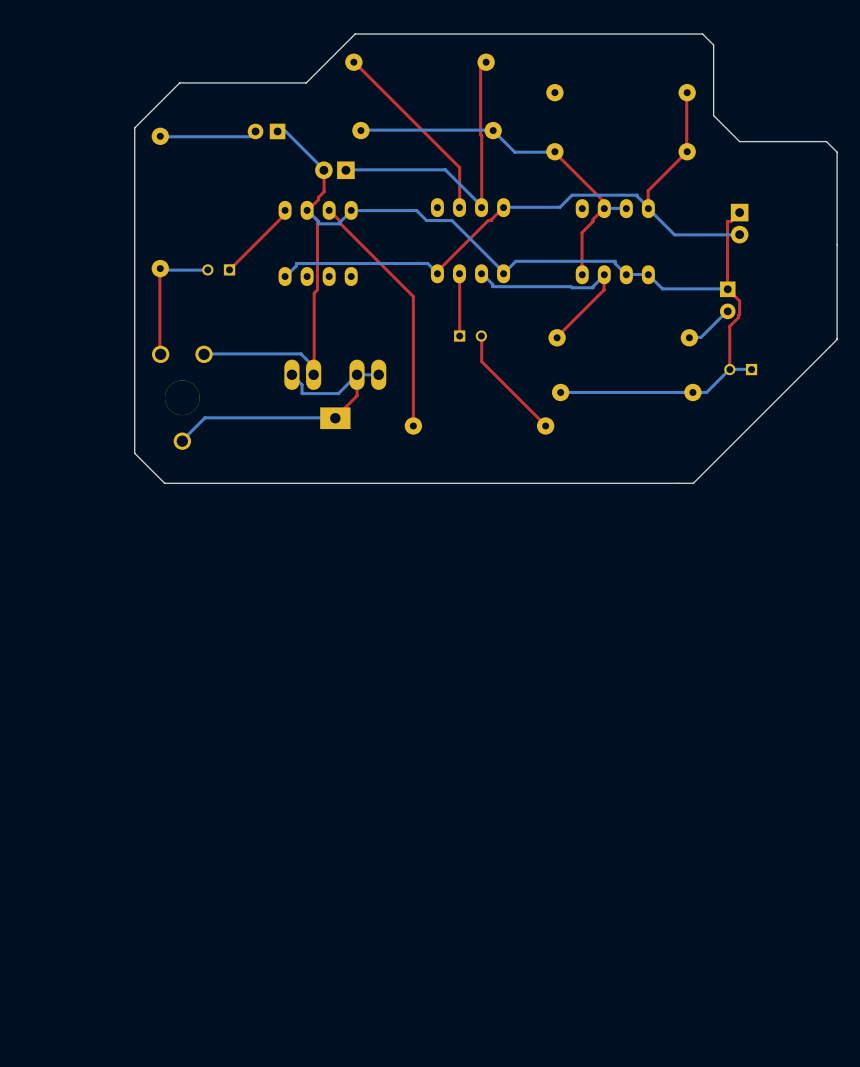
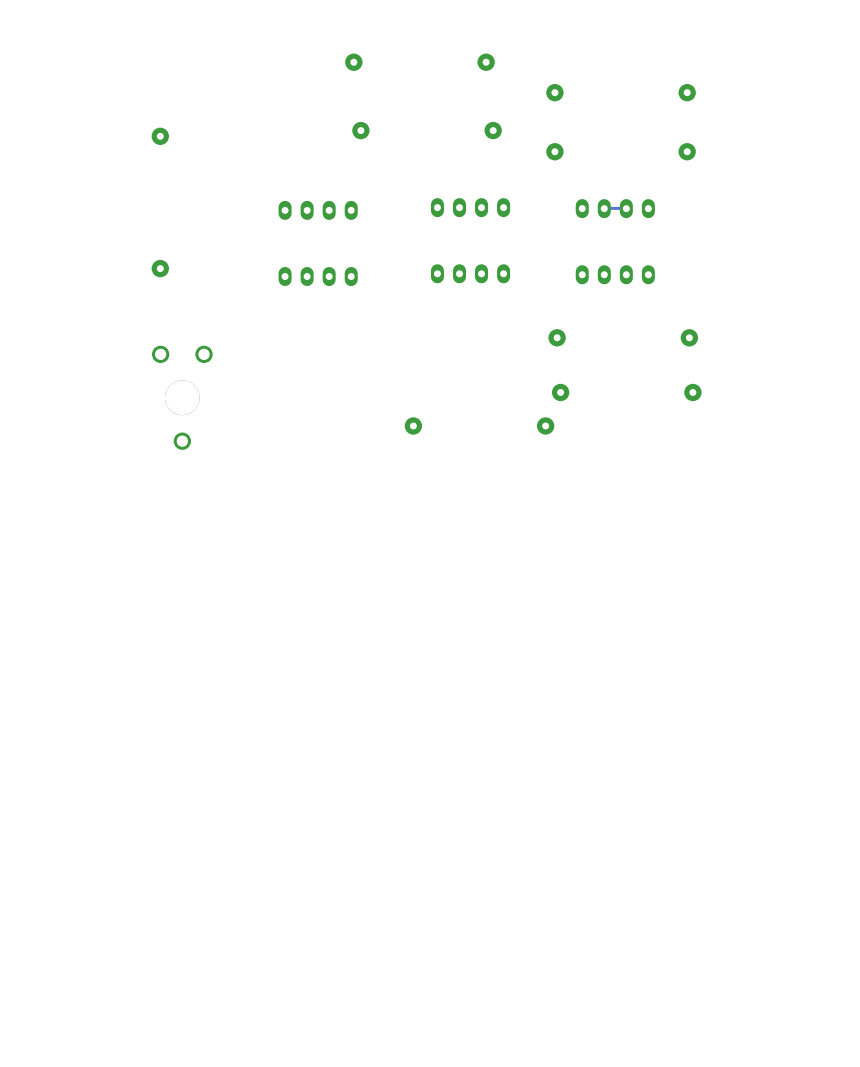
board edge: (702, 34) (355, 34) (306, 82) (179, 82) (134, 127) (134, 453) (164, 483) (693, 483) (837, 339) (837, 152) (826, 141) (739, 141) (713, 115) (713, 45) (702, 34) -> none
top track: (353, 62) (459, 167) (459, 207) -> none
top track: (486, 62) (480, 67) (481, 207) -> none
top track: (687, 92) (686, 152) -> none
bottom track: (360, 130) (492, 130) (514, 152) (554, 151) -> none
bottom track: (255, 131) (250, 136) (160, 136) -> none
part: (266, 131) -> none
bottom track: (277, 131) (285, 131) (323, 170) -> none
top track: (554, 151) (604, 201) (604, 208) (582, 232) (582, 274) -> none
top track: (687, 151) (648, 190) (648, 208) -> none
top track: (323, 170) (324, 191) (307, 210) -> none
part: (334, 170) -> none
bottom track: (345, 170) (445, 169) (481, 207) -> none
top track: (503, 207) (491, 220) (488, 220) (437, 271) (437, 273) -> none
bottom track: (503, 207) (559, 207) (572, 195) (637, 195) (674, 234) (739, 234) -> none
top track: (285, 210) (285, 213) (229, 269) -> none
top track: (307, 210) (317, 220) (317, 289) (314, 293) (313, 374) -> none
bottom track: (307, 210) (318, 223) (339, 223) (351, 210) -> none
top track: (329, 210) (413, 296) (413, 425) -> none
bottom track: (351, 210) (416, 210) (426, 220) (451, 220) (503, 273) -> none
top track: (739, 212) (730, 221) (727, 221) (727, 288) -> none
part: (739, 223) -> none
top track: (160, 268) (160, 354) -> none
bottom track: (160, 268) (160, 270) (207, 269) -> none
part: (218, 269) -> none
bottom track: (437, 273) (427, 263) (296, 263) (285, 276) -> none
top track: (459, 273) (459, 336) -> none
bottom track: (481, 273) (492, 286) (572, 287) (593, 287) (604, 274) -> none
bottom track: (503, 273) (515, 261) (615, 261) (626, 274) -> none
top track: (604, 274) (604, 289) (557, 337) -> none
bottom track: (626, 274) (648, 274) (662, 288) (727, 289) -> none
top track: (727, 288) (739, 300) (738, 317) (729, 326) (729, 369) -> none
part: (727, 300) -> none
bottom track: (727, 311) (701, 337) (689, 337) -> none
part: (470, 336) -> none
top track: (481, 336) (481, 361) (545, 425) -> none
bottom track: (204, 354) (300, 353) (314, 367) (313, 374) -> none
bottom track: (729, 369) (706, 392) (560, 392) -> none
bottom track: (729, 369) (751, 369) -> none
part: (740, 369) -> none
top track: (357, 374) (357, 395) (335, 418) -> none
bottom track: (378, 374) (357, 374) (338, 393) (302, 393) (302, 384) (291, 374) -> none
part: (335, 394) -> none
bottom track: (335, 418) (205, 417) (182, 441) -> none

